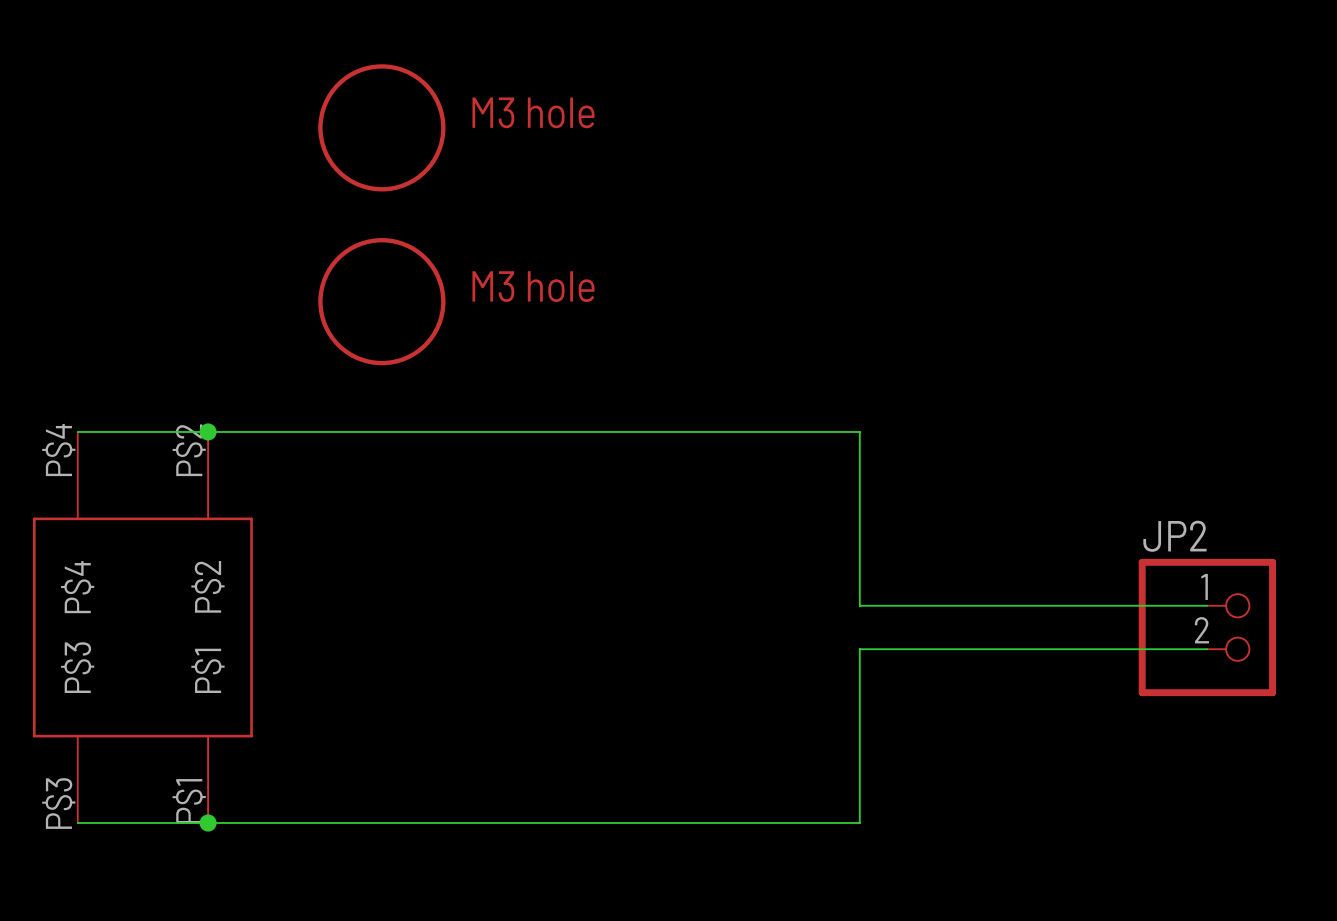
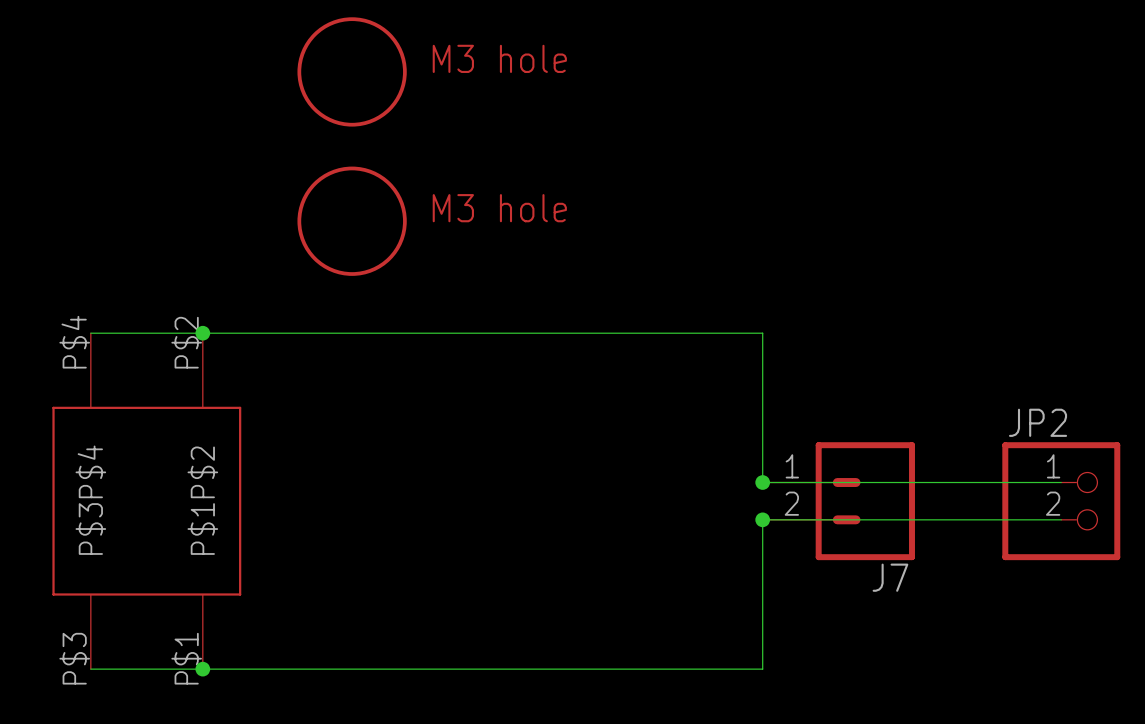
junction: none -> (762, 482)
J7: none -> (838, 501)
junction: none -> (762, 519)

